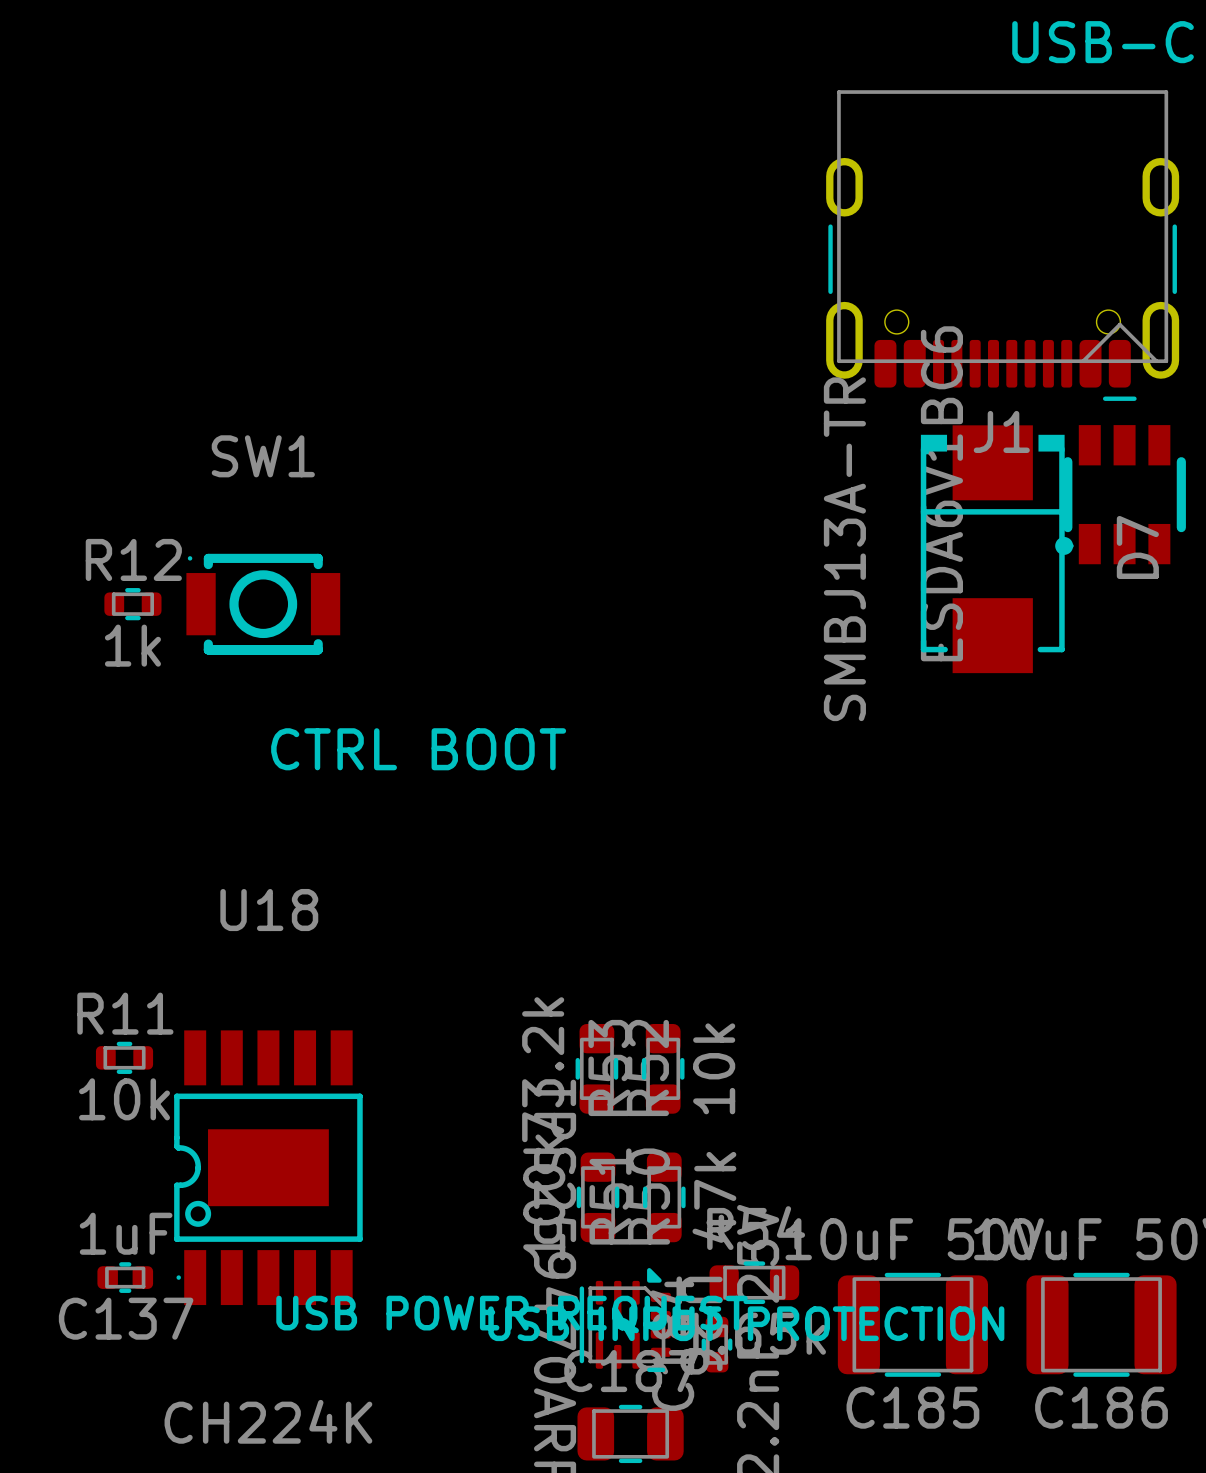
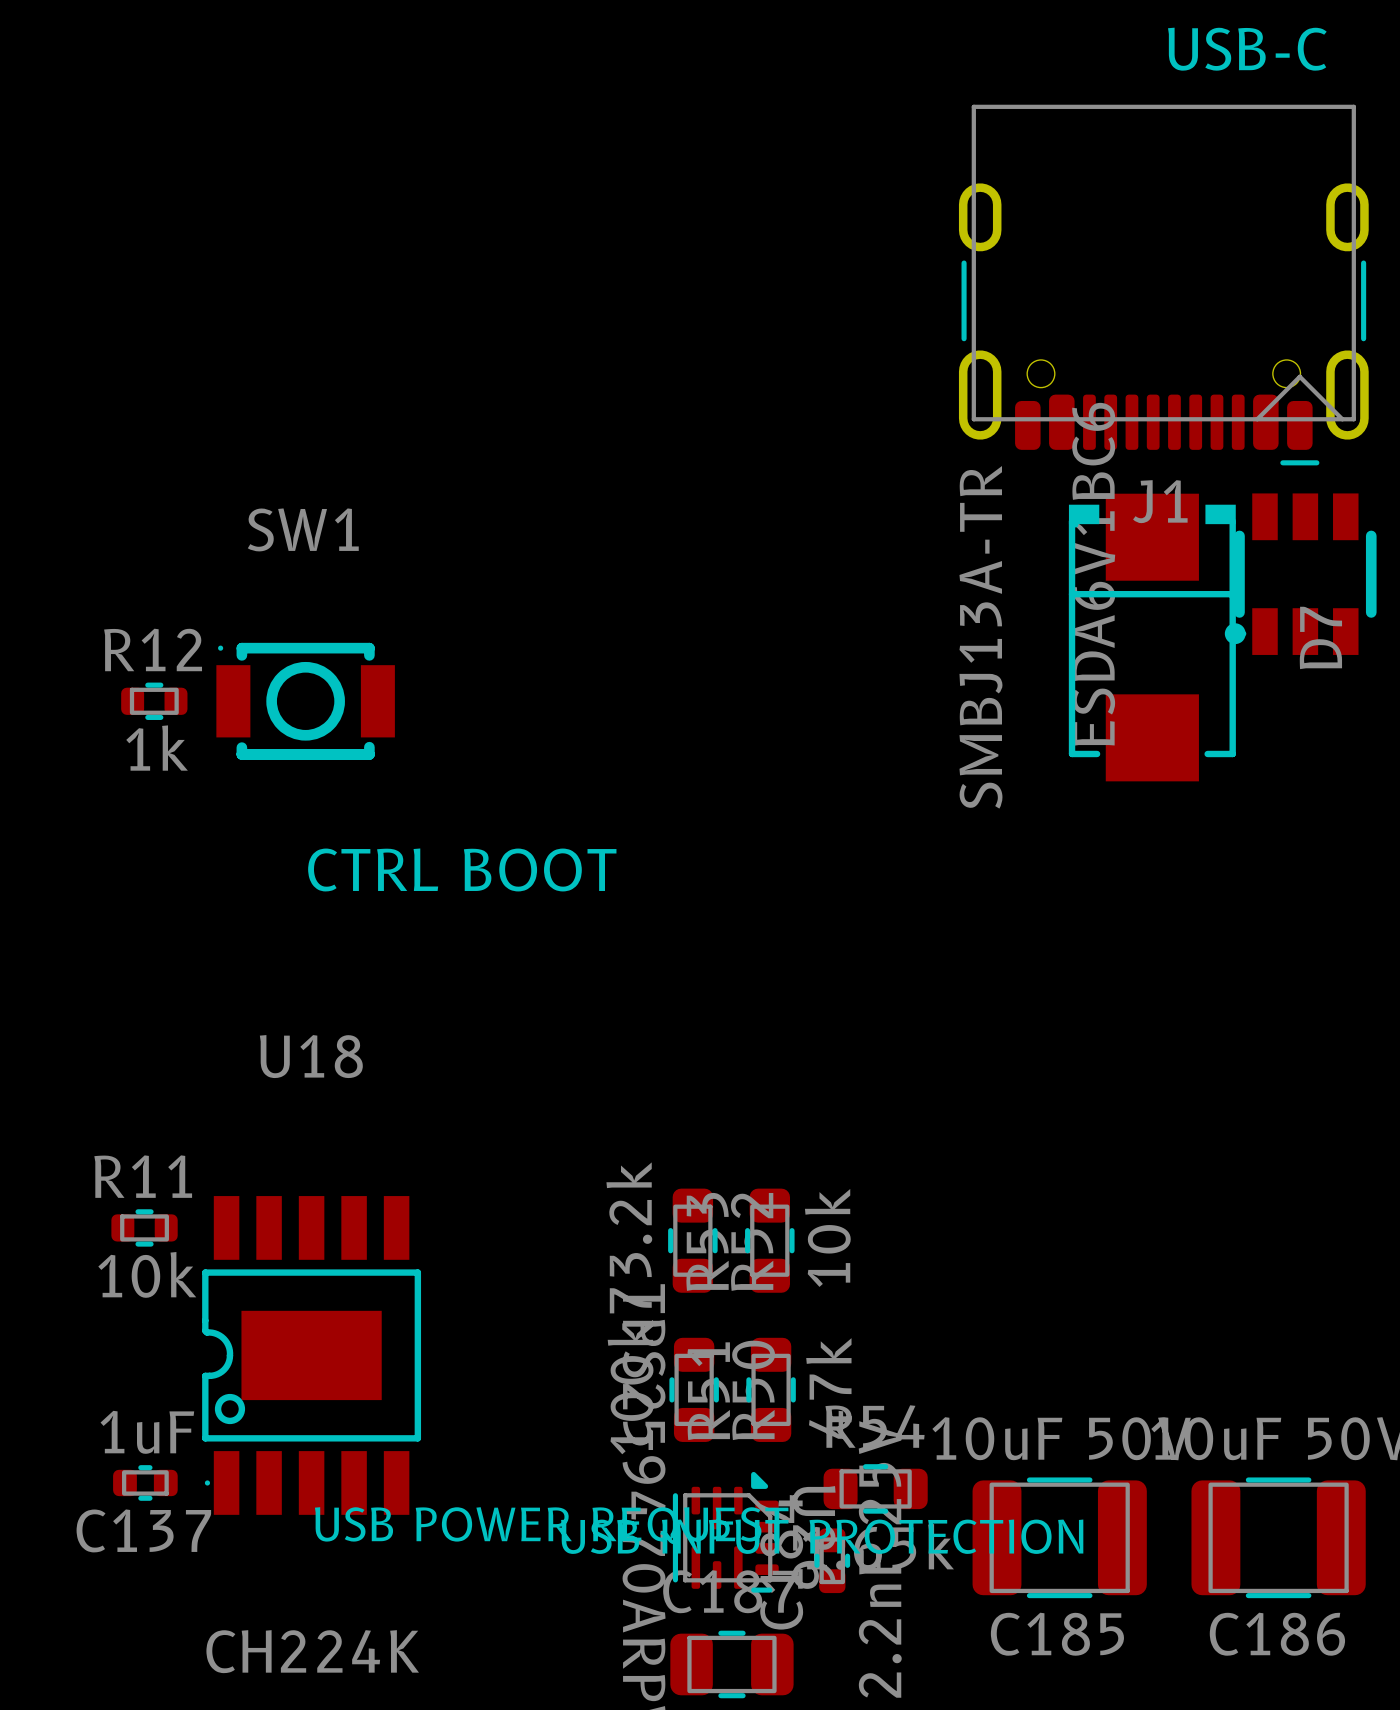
J1 footprint: [826, 90, 1180, 401] -> [958, 104, 1369, 466]

